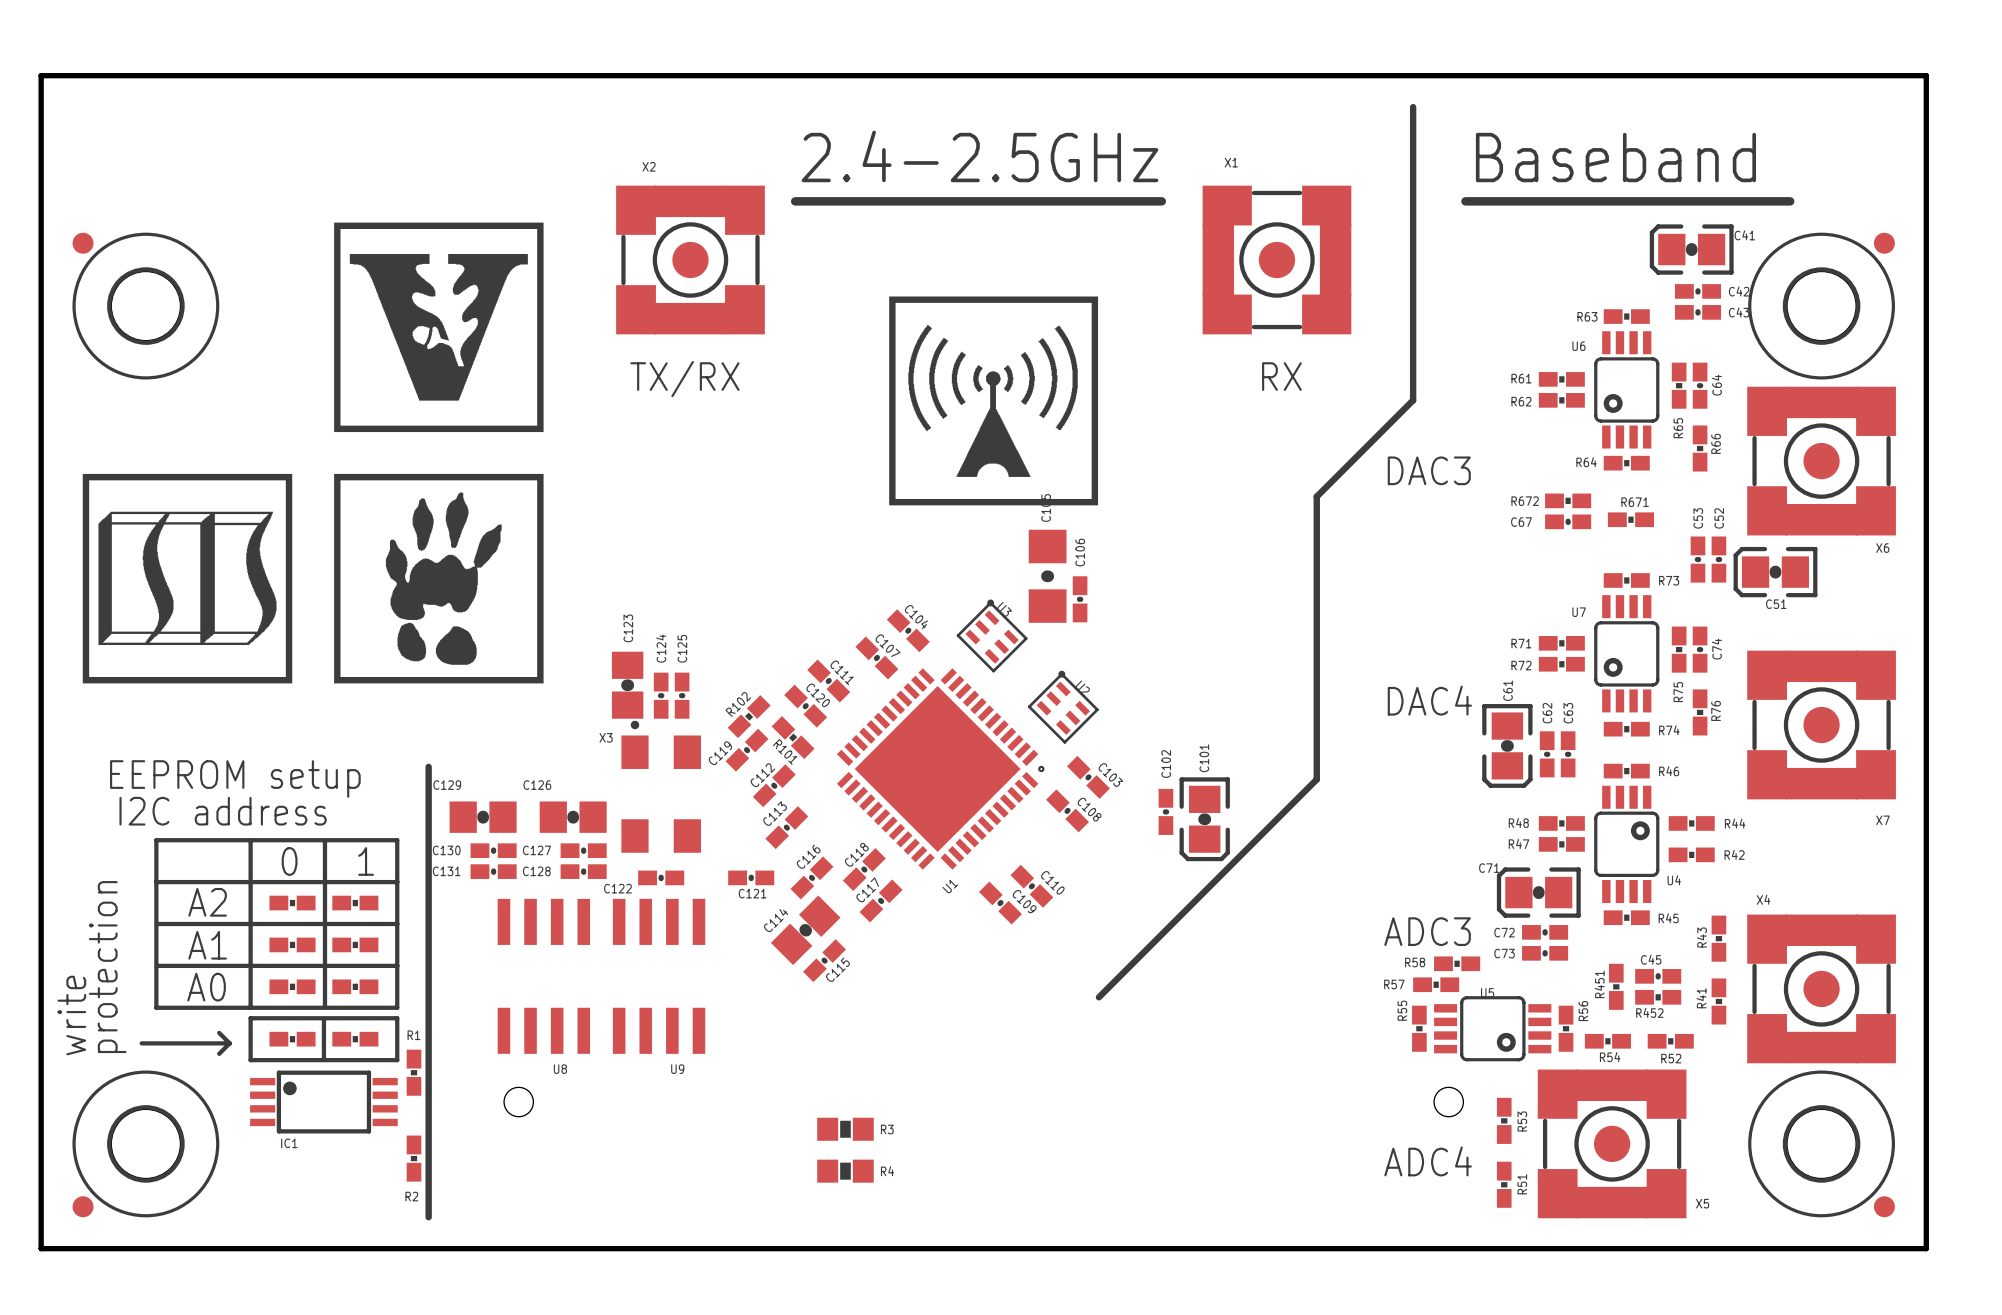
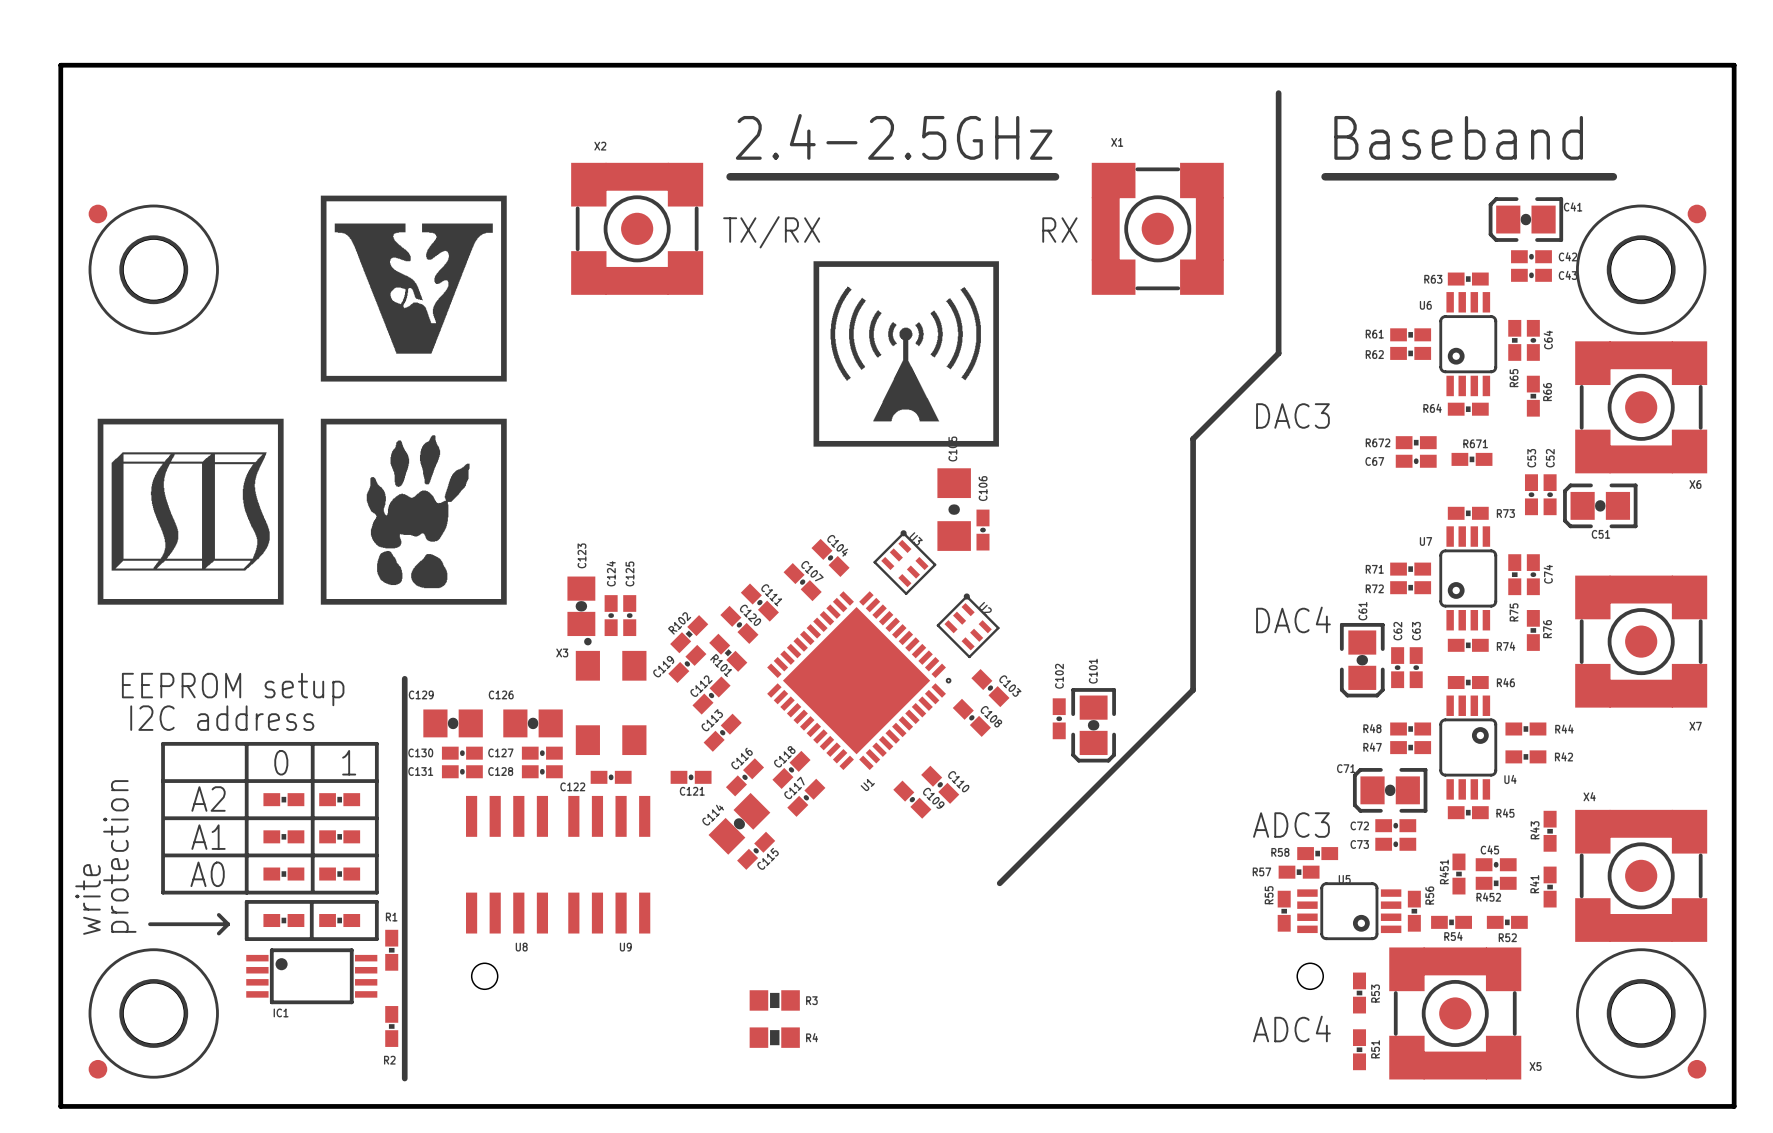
text position: RX (1281, 376) -> RX (1059, 230)
text position: TX/RX (684, 379) -> TX/RX (771, 232)

